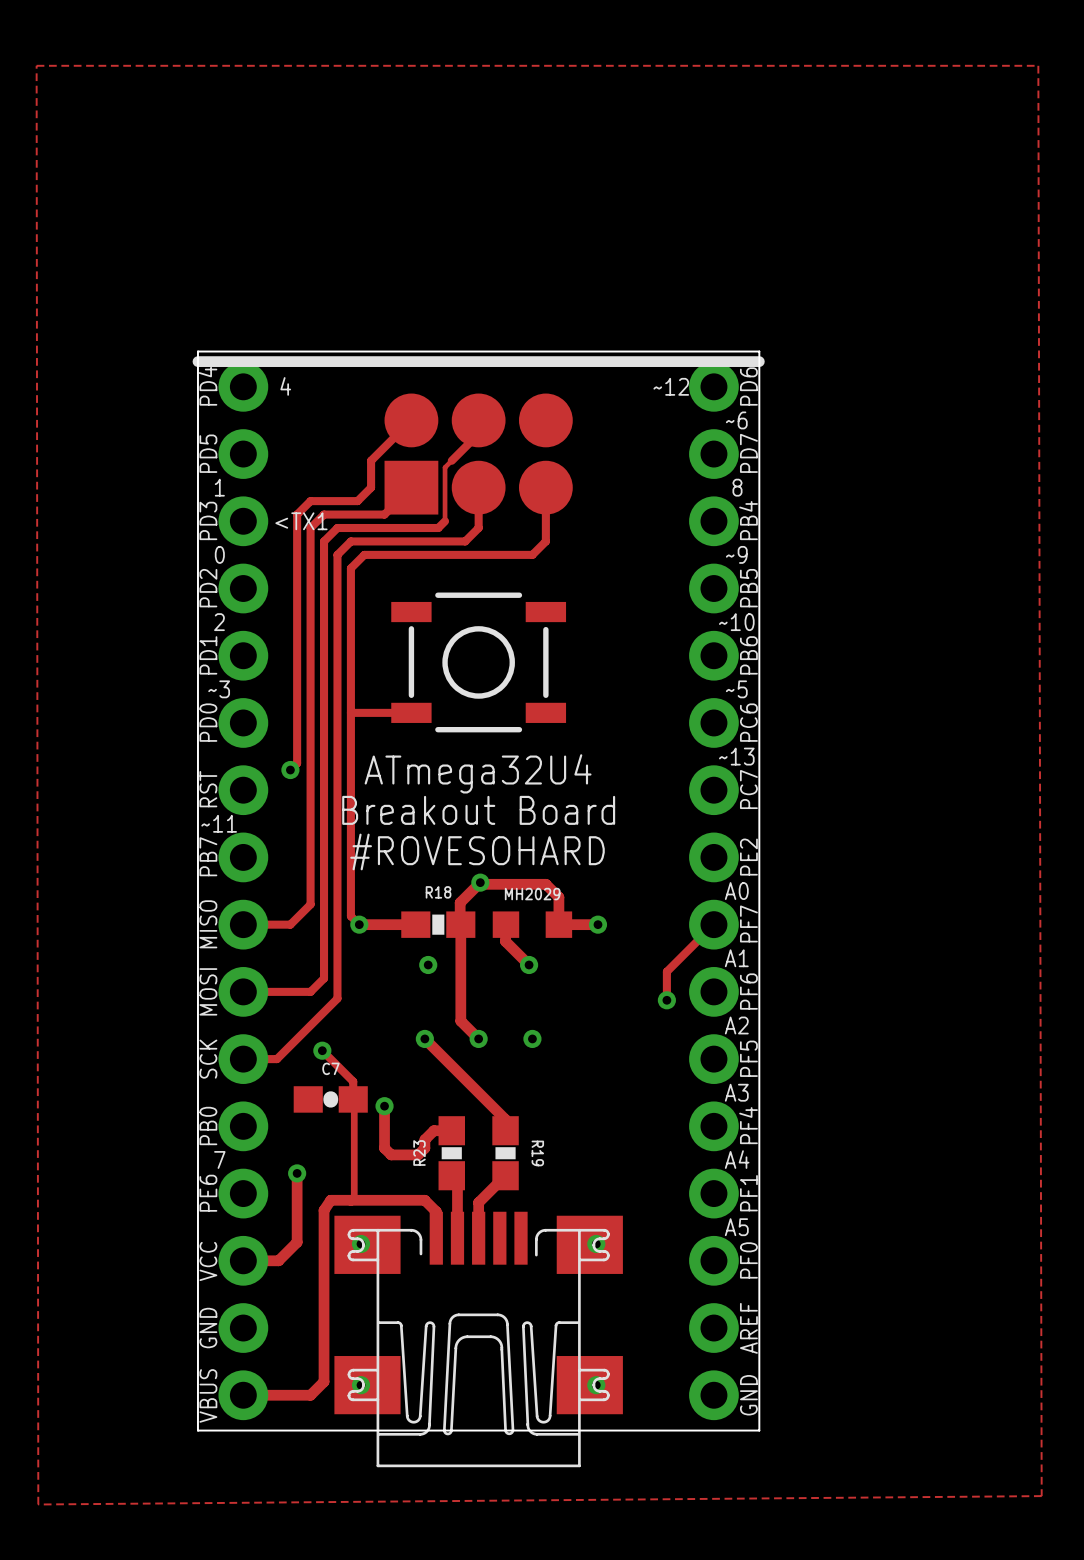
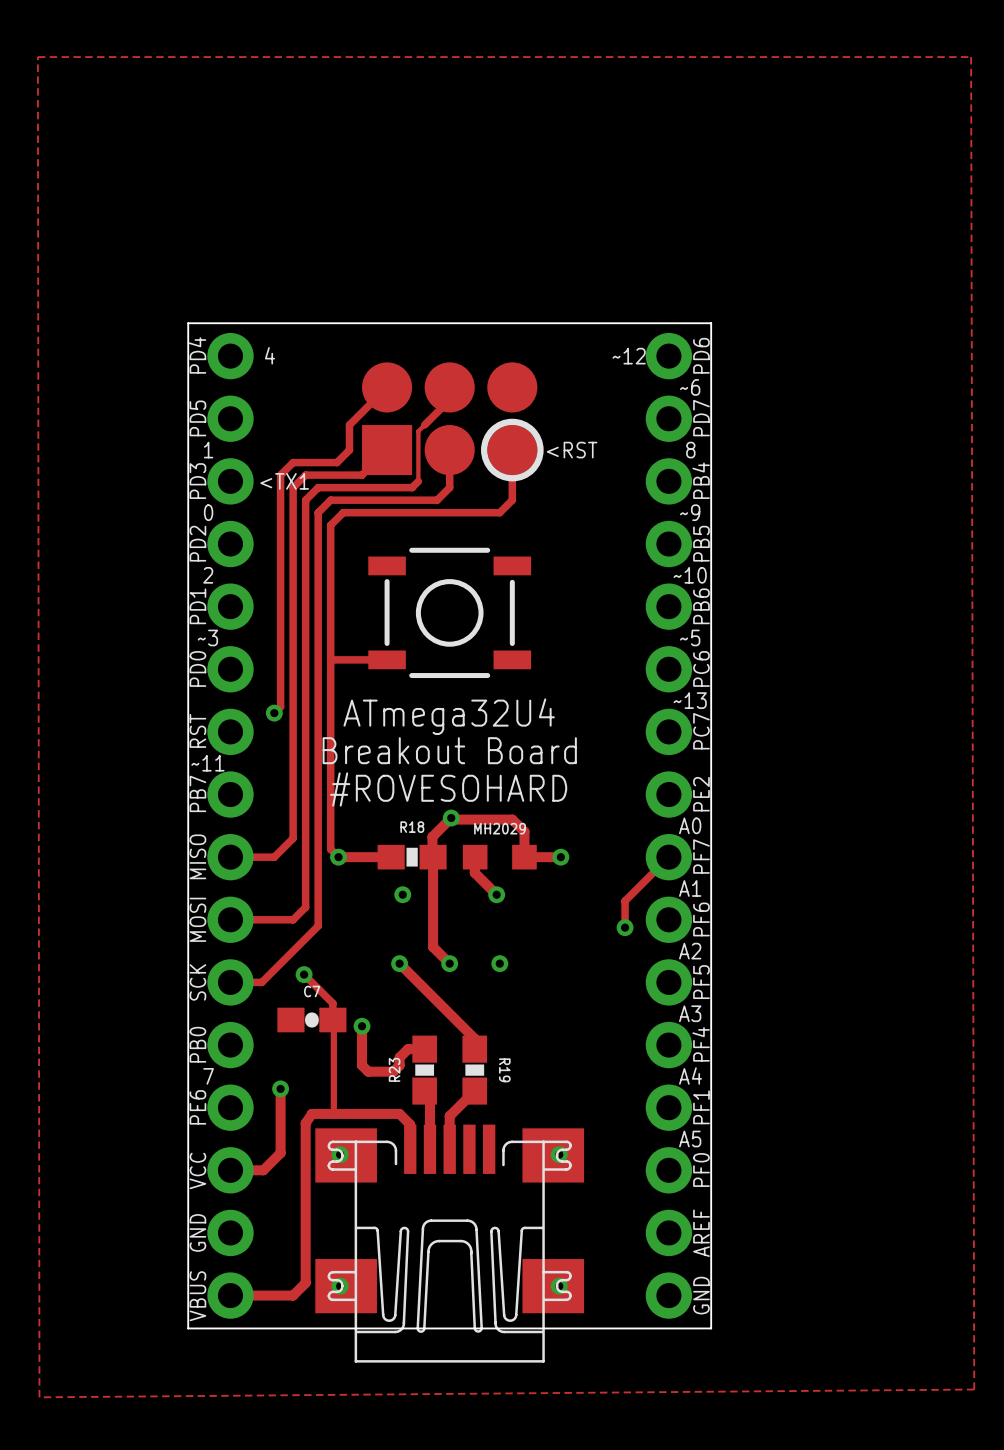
line: (197, 361) (759, 361) -> none
drawing: none -> [481, 418, 544, 482]
text: none -> <RST (572, 450)

